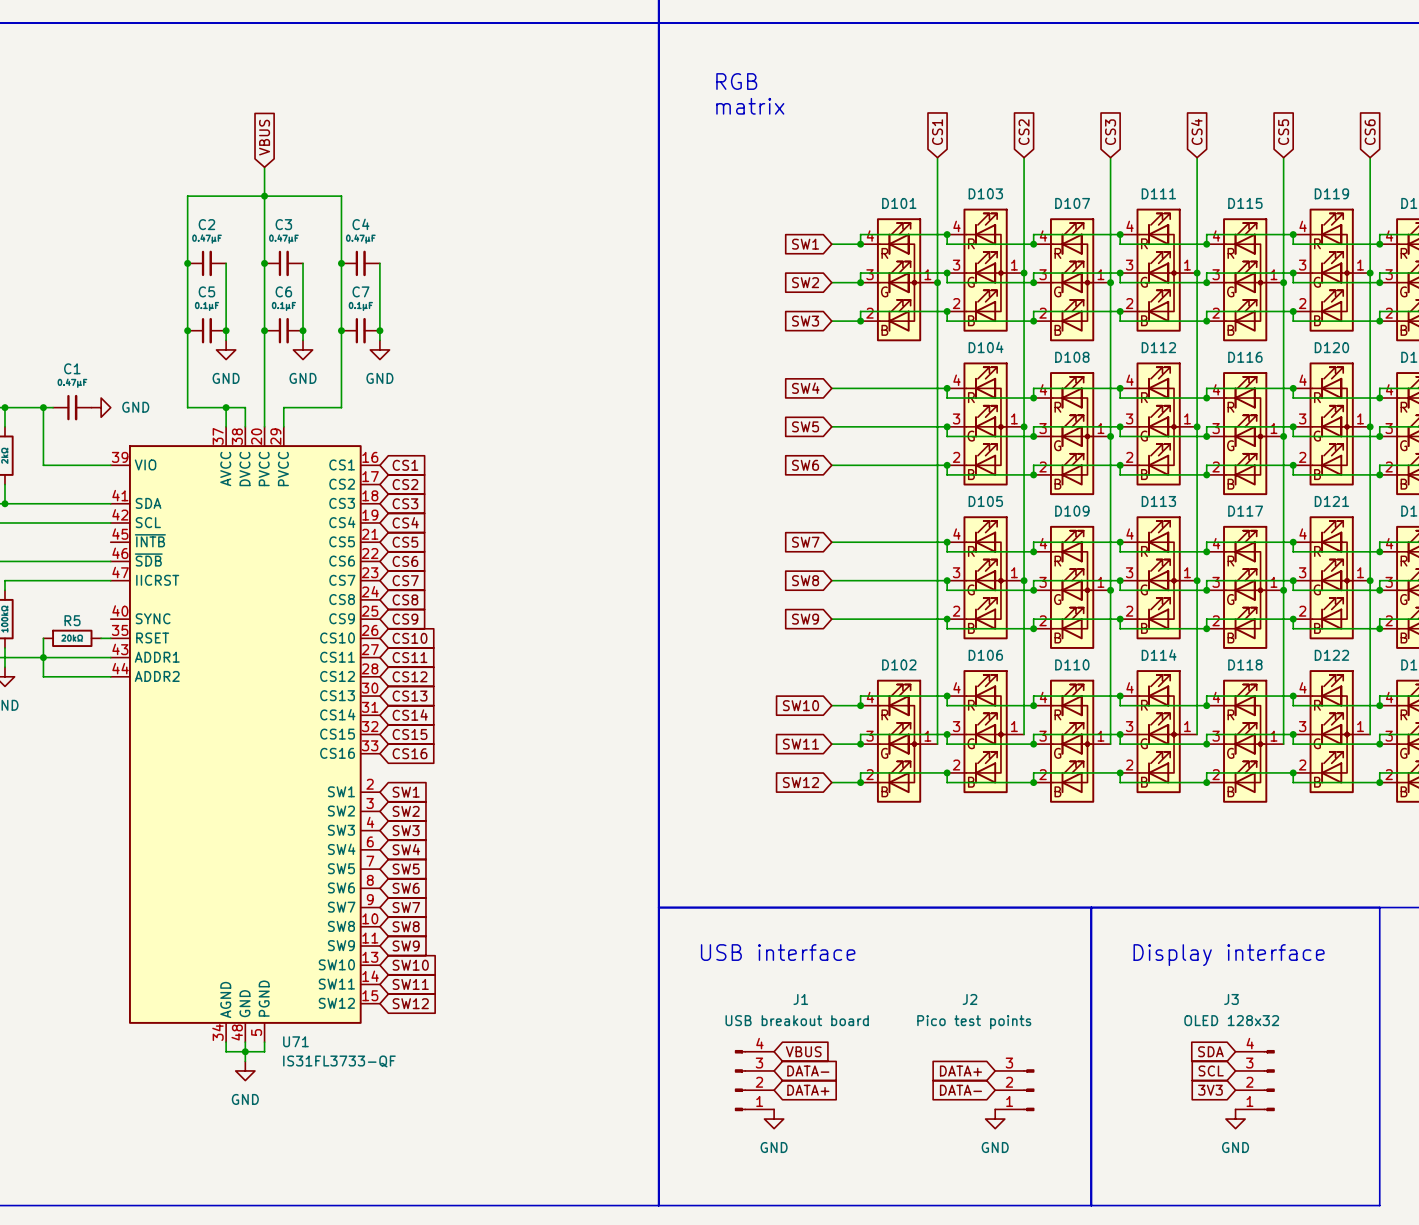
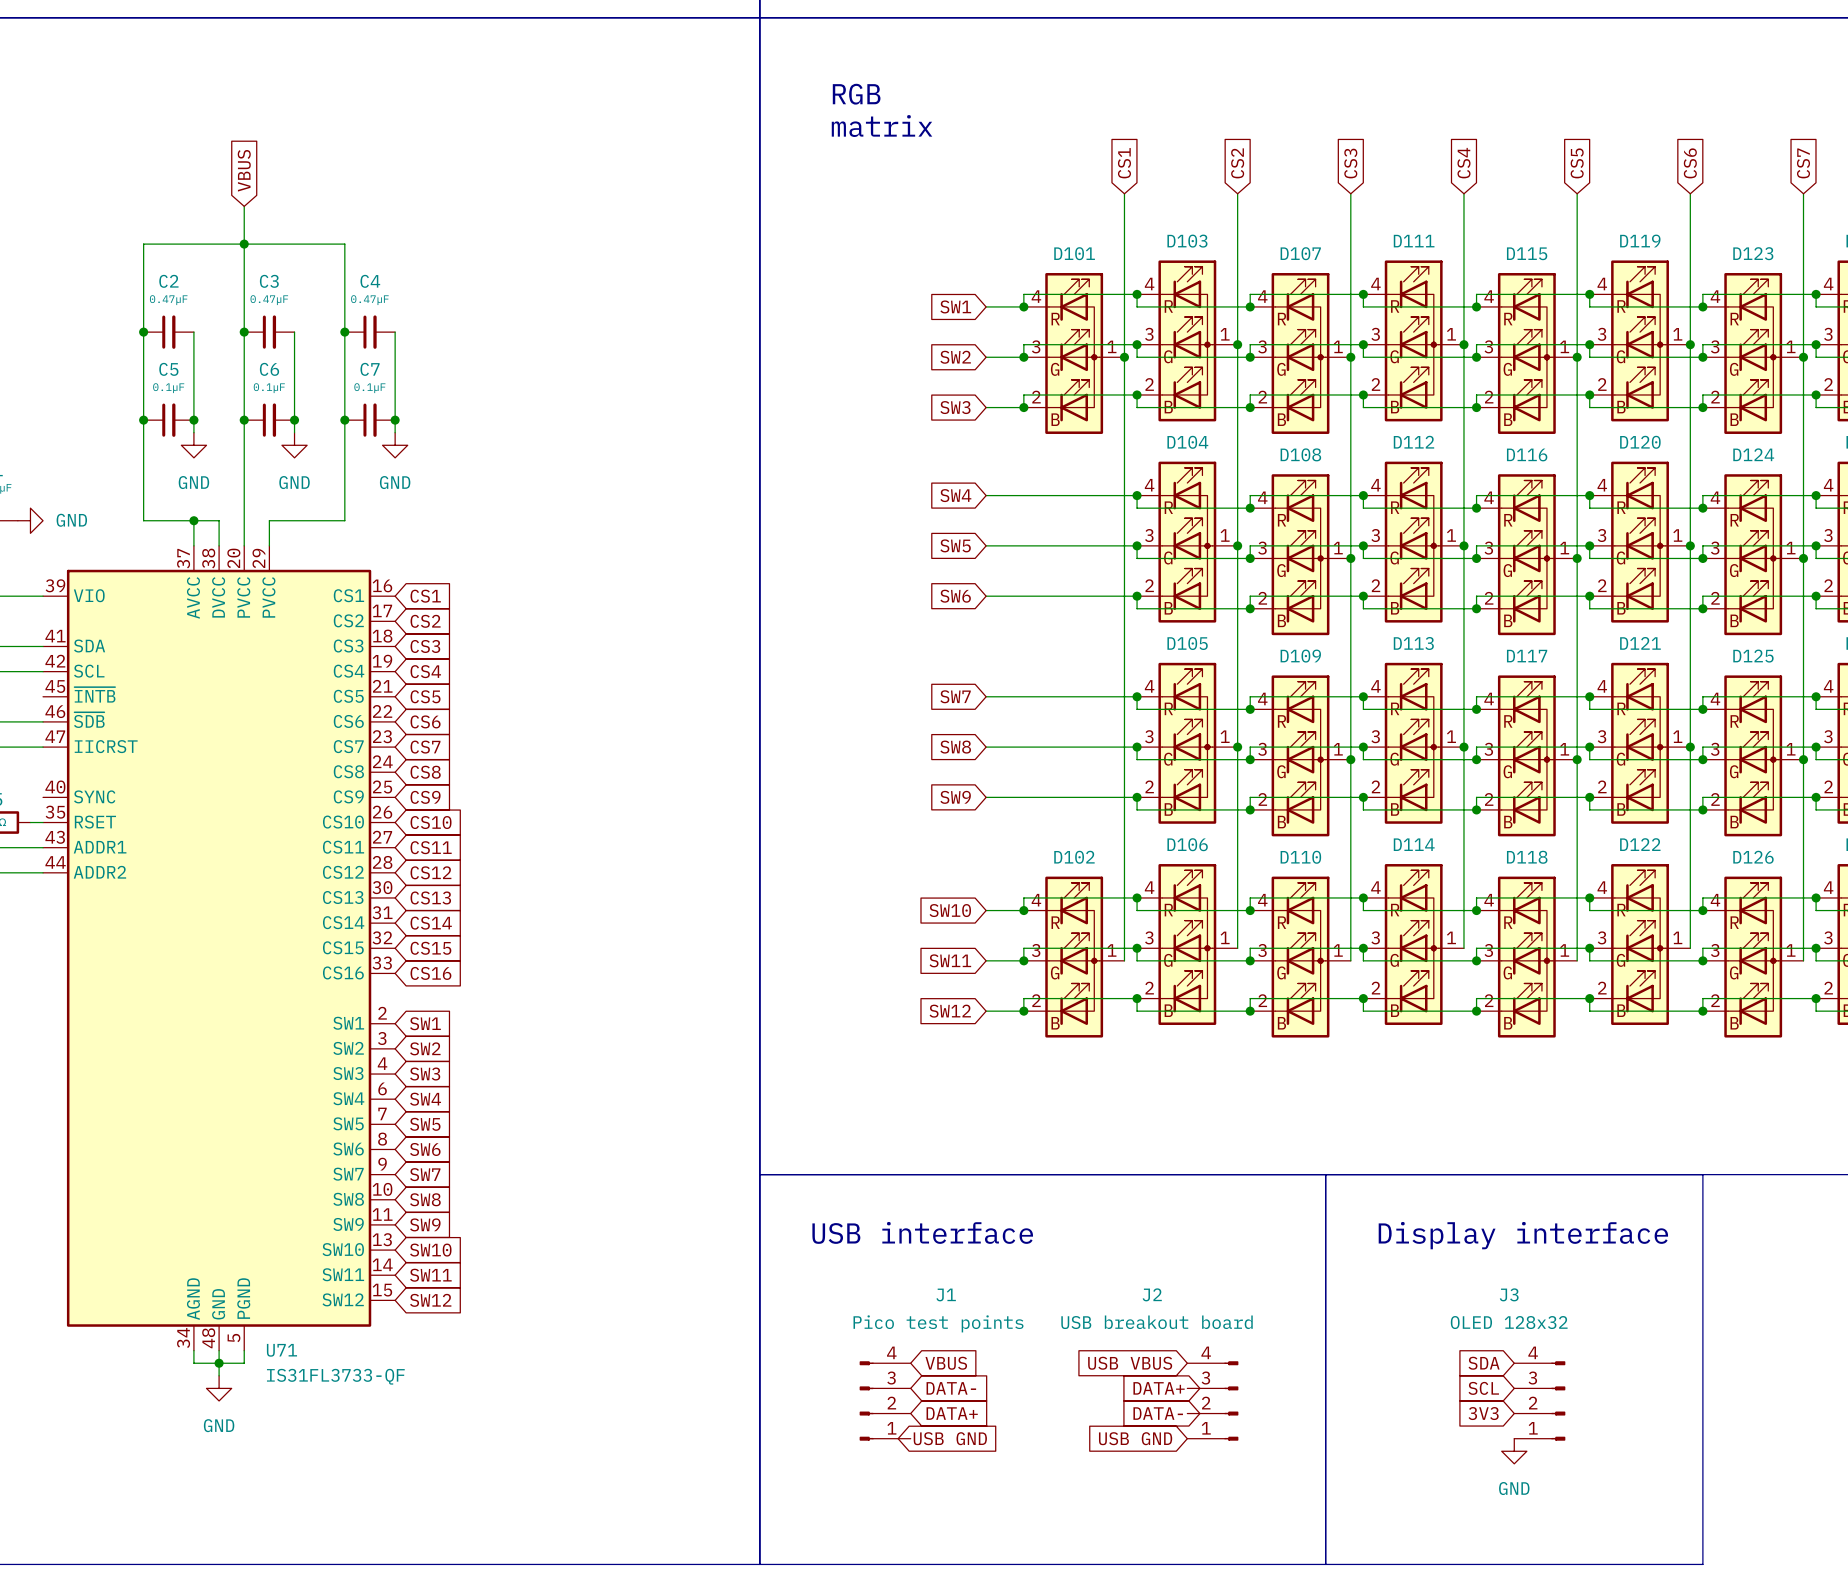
J1 value: USB breakout board (797, 1020) -> Pico test points (938, 1323)
J2 value: Pico test points (974, 1022) -> USB breakout board (1157, 1322)
global label: none -> USB VBUS (1130, 1363)
J2 symbol: [995, 1069, 1035, 1111] -> [1187, 1361, 1239, 1441]
global label: none -> USB GND (950, 1438)
global label: none -> USB GND (1135, 1438)
power symbol: GND (774, 1119) -> none
power symbol: GND (995, 1119) -> none

